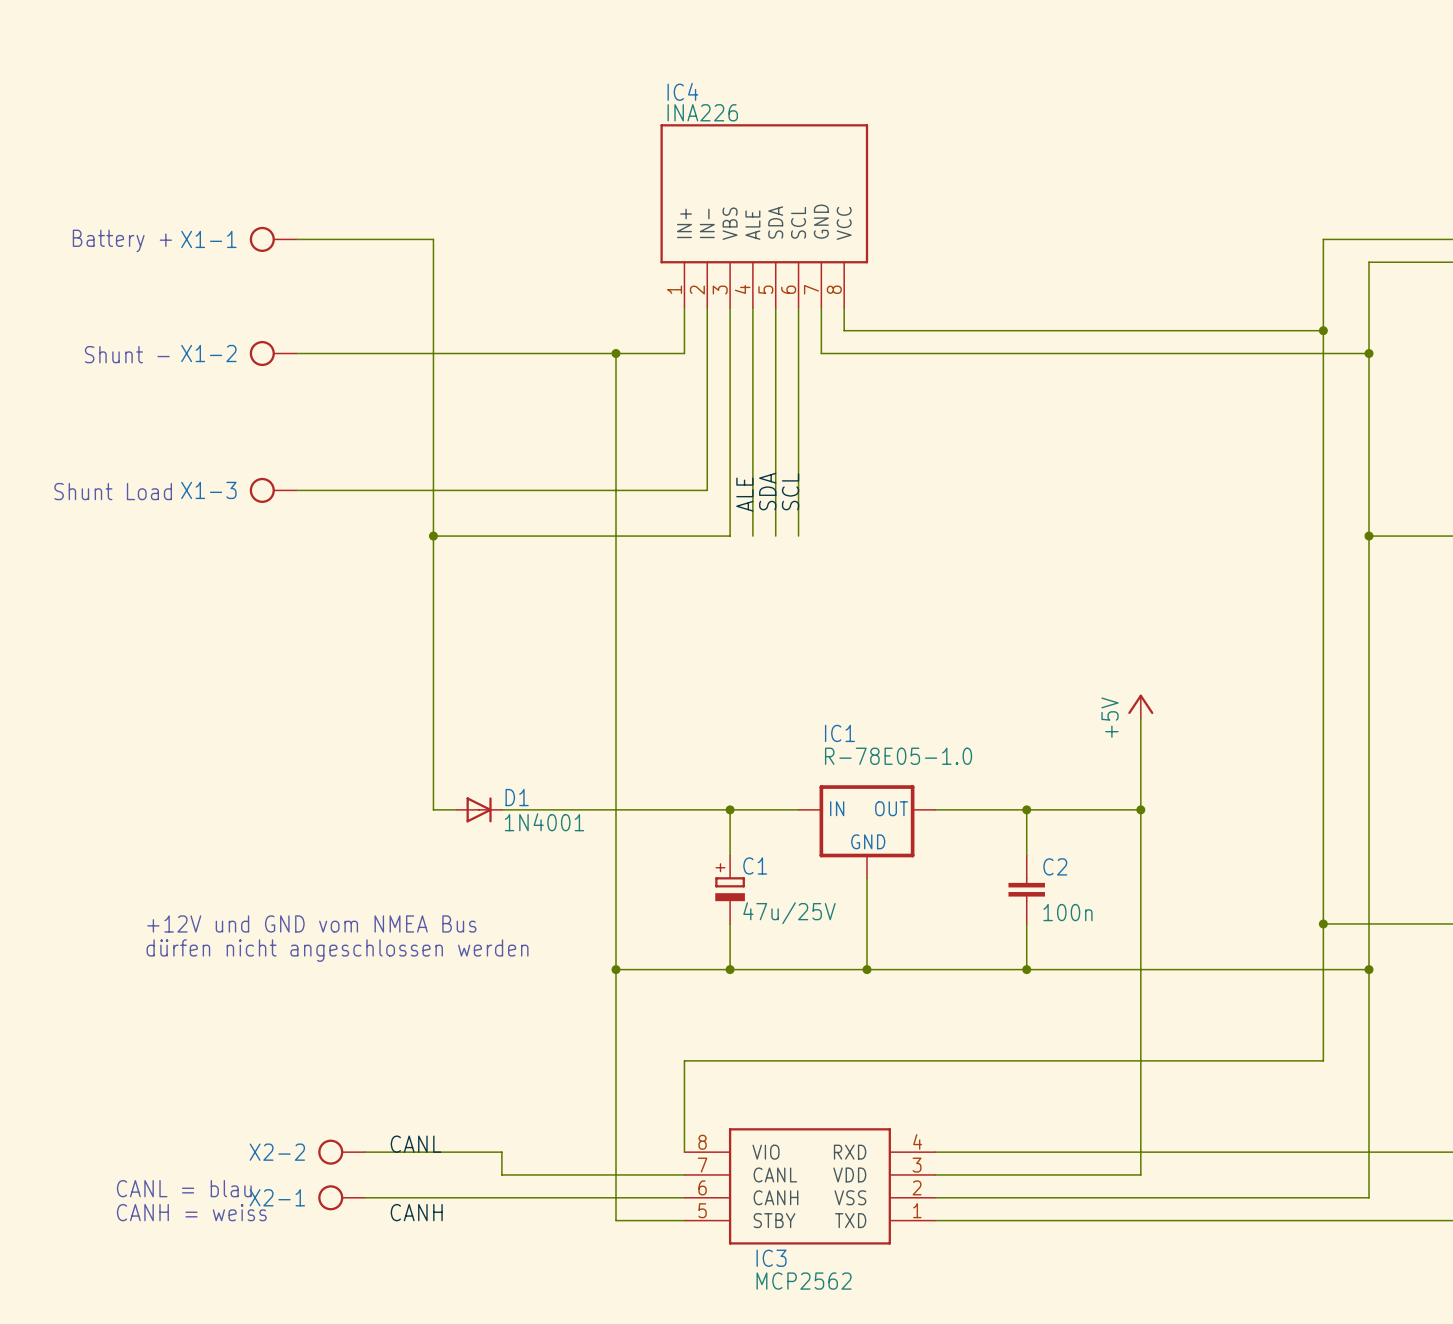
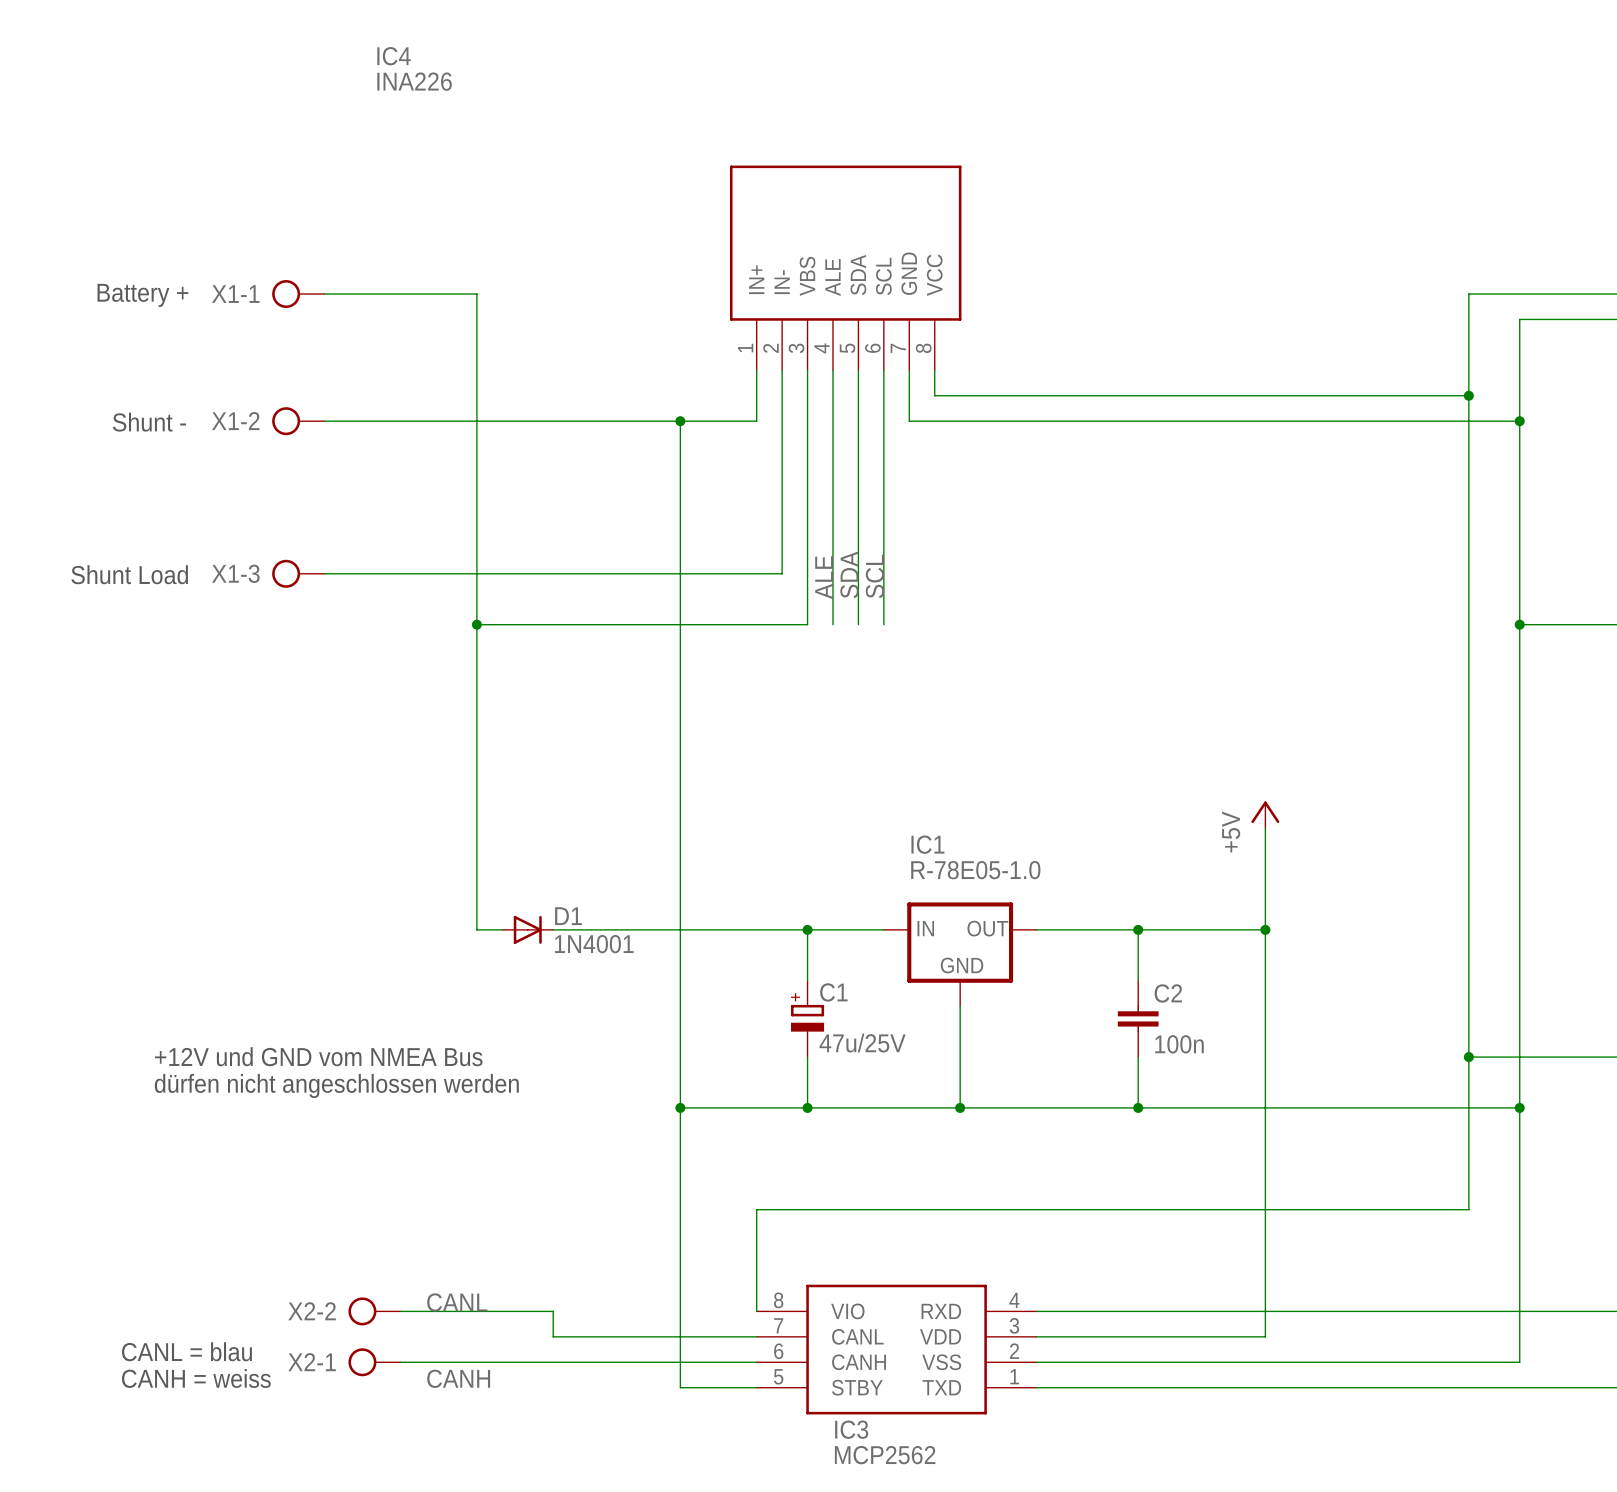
IC4 name position: IC4 (682, 91) -> IC4 (394, 56)
IC4 value position: INA226 (702, 112) -> INA226 (414, 81)

